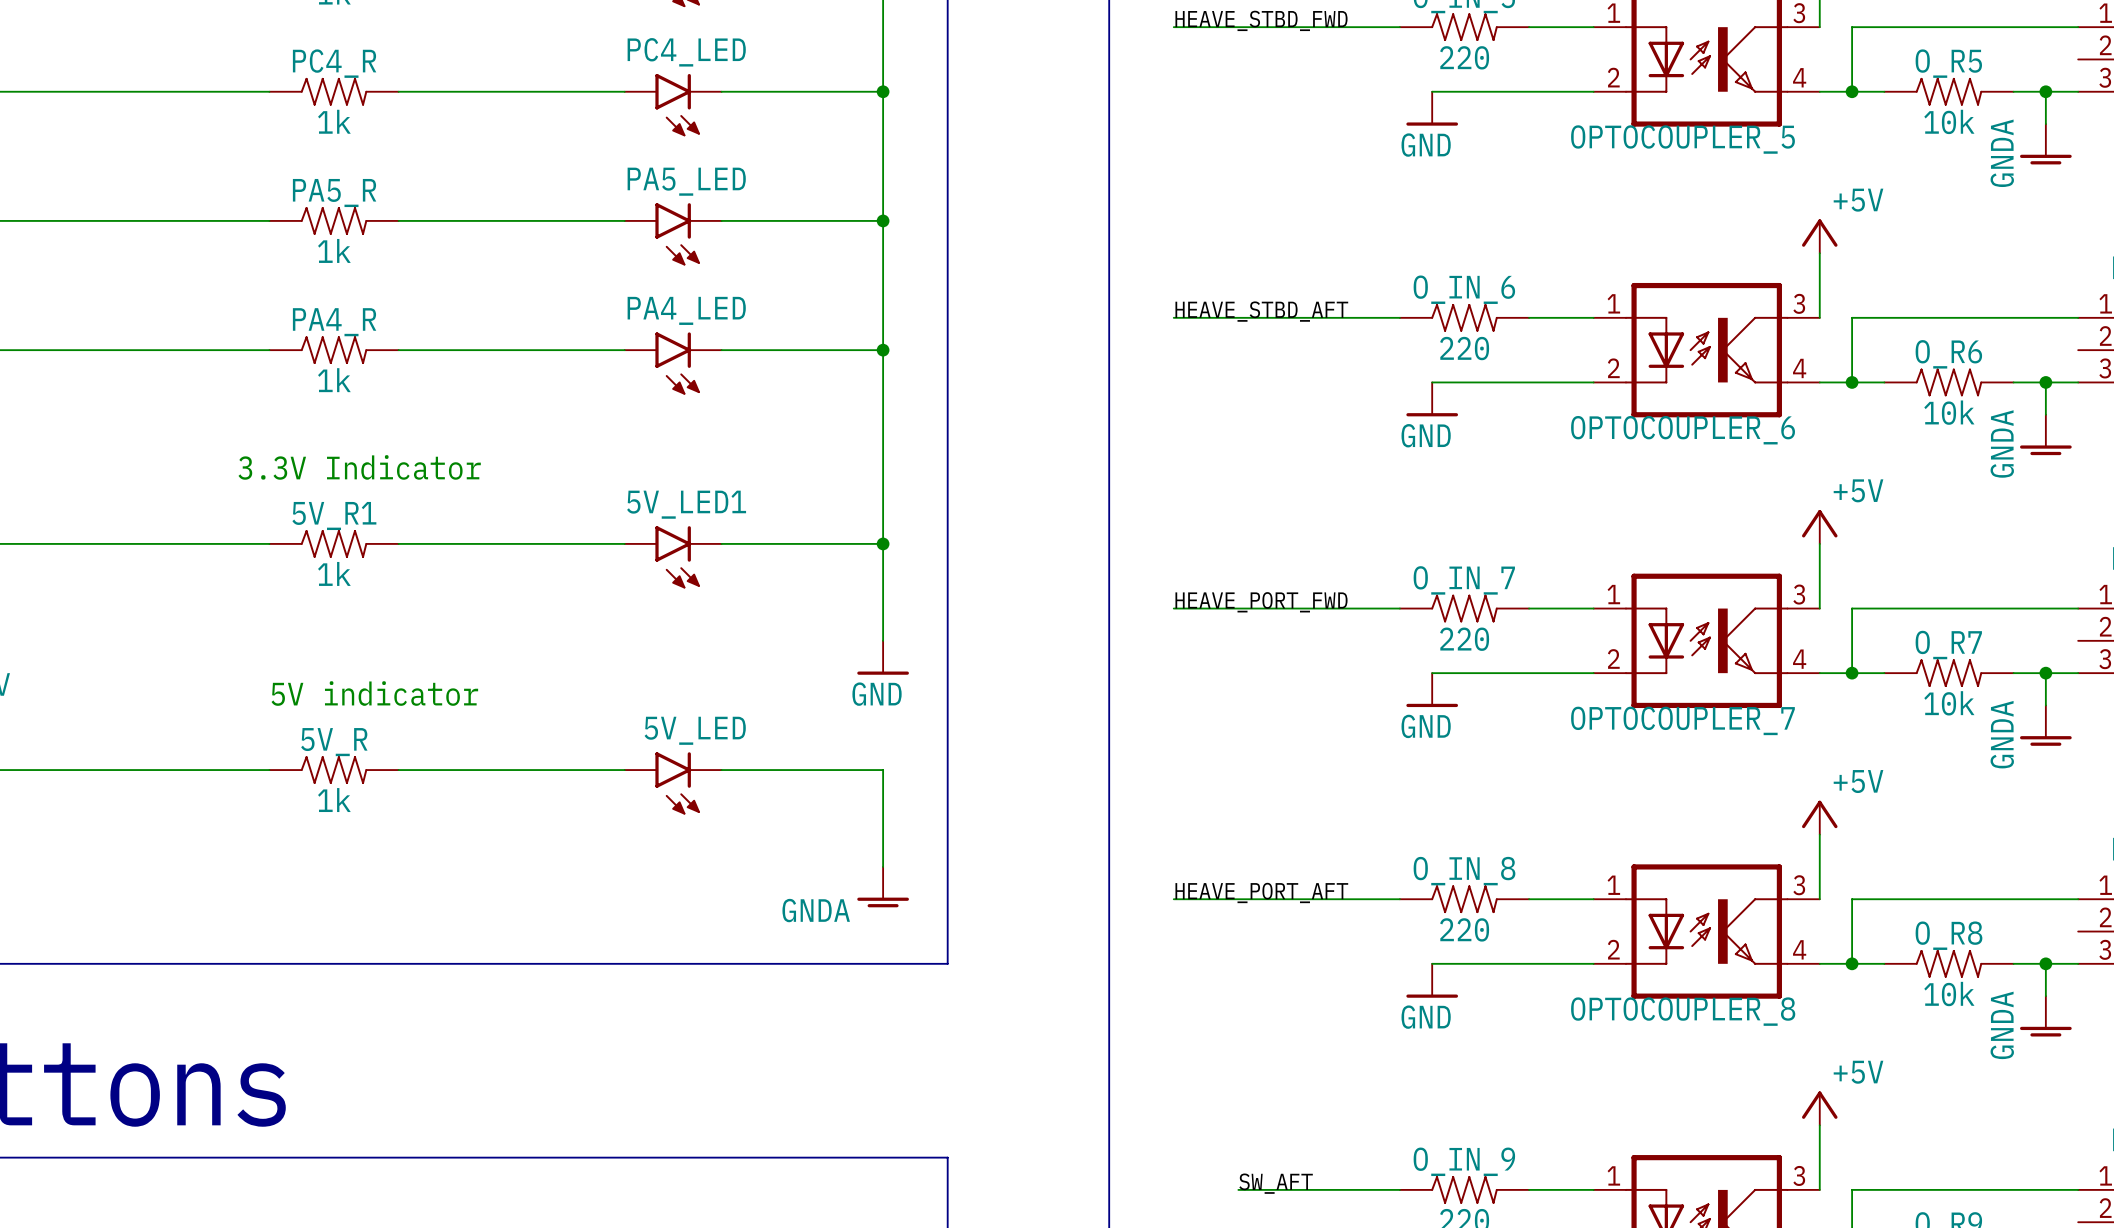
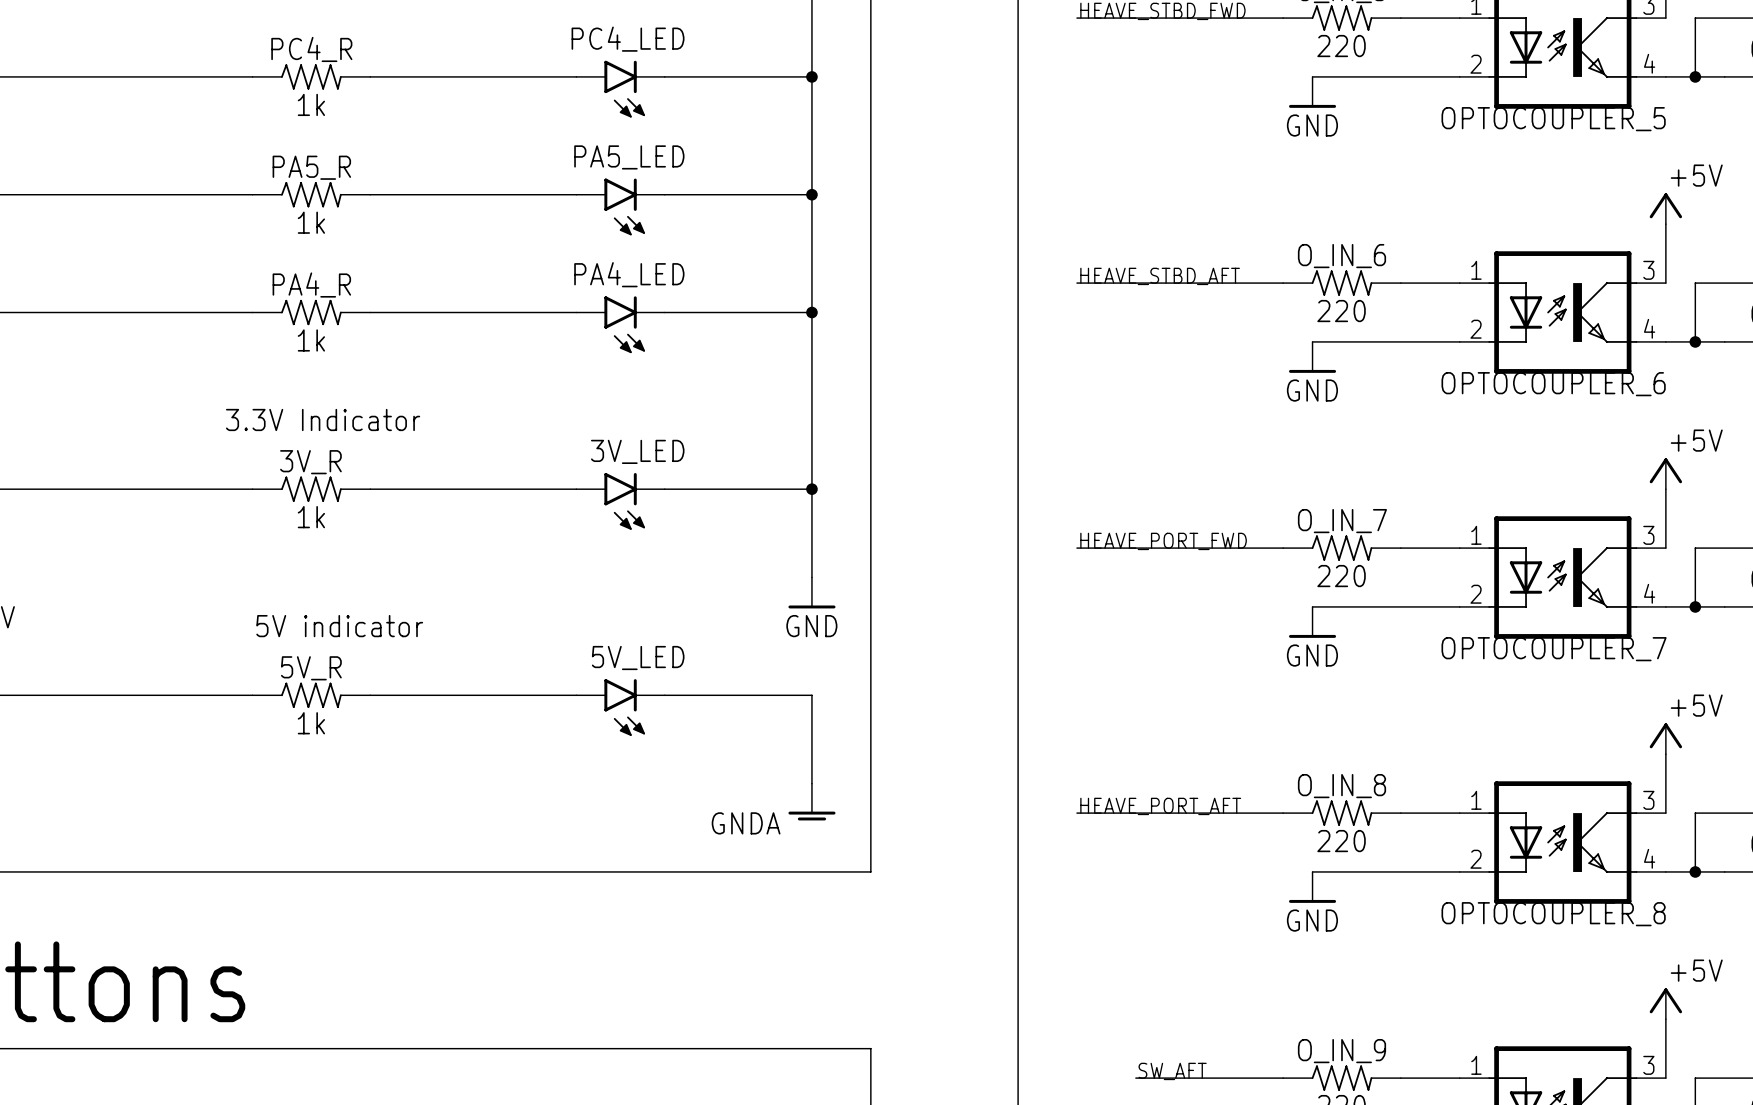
5V_LED1 name: 5V_LED1 (686, 504) -> 3V_LED (637, 451)
5V_R1 name: 5V_R1 (334, 515) -> 3V_R (310, 462)

